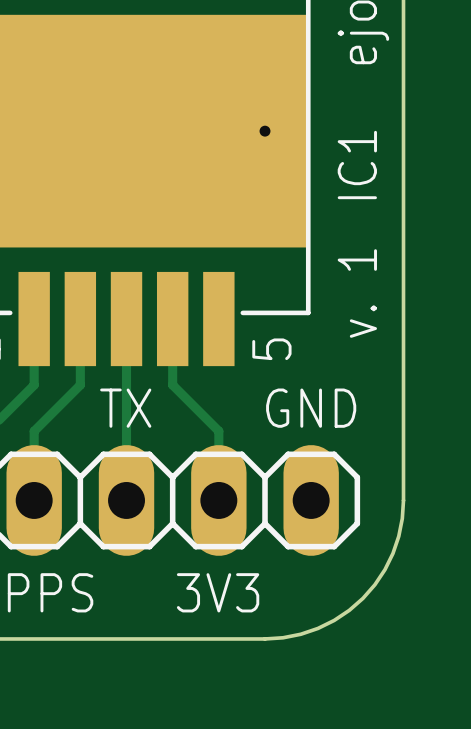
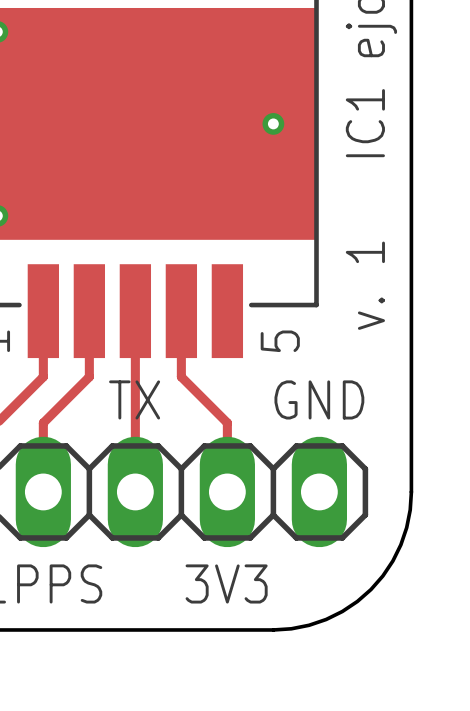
IC1 name position: IC1 (357, 165) -> IC1 (365, 123)

